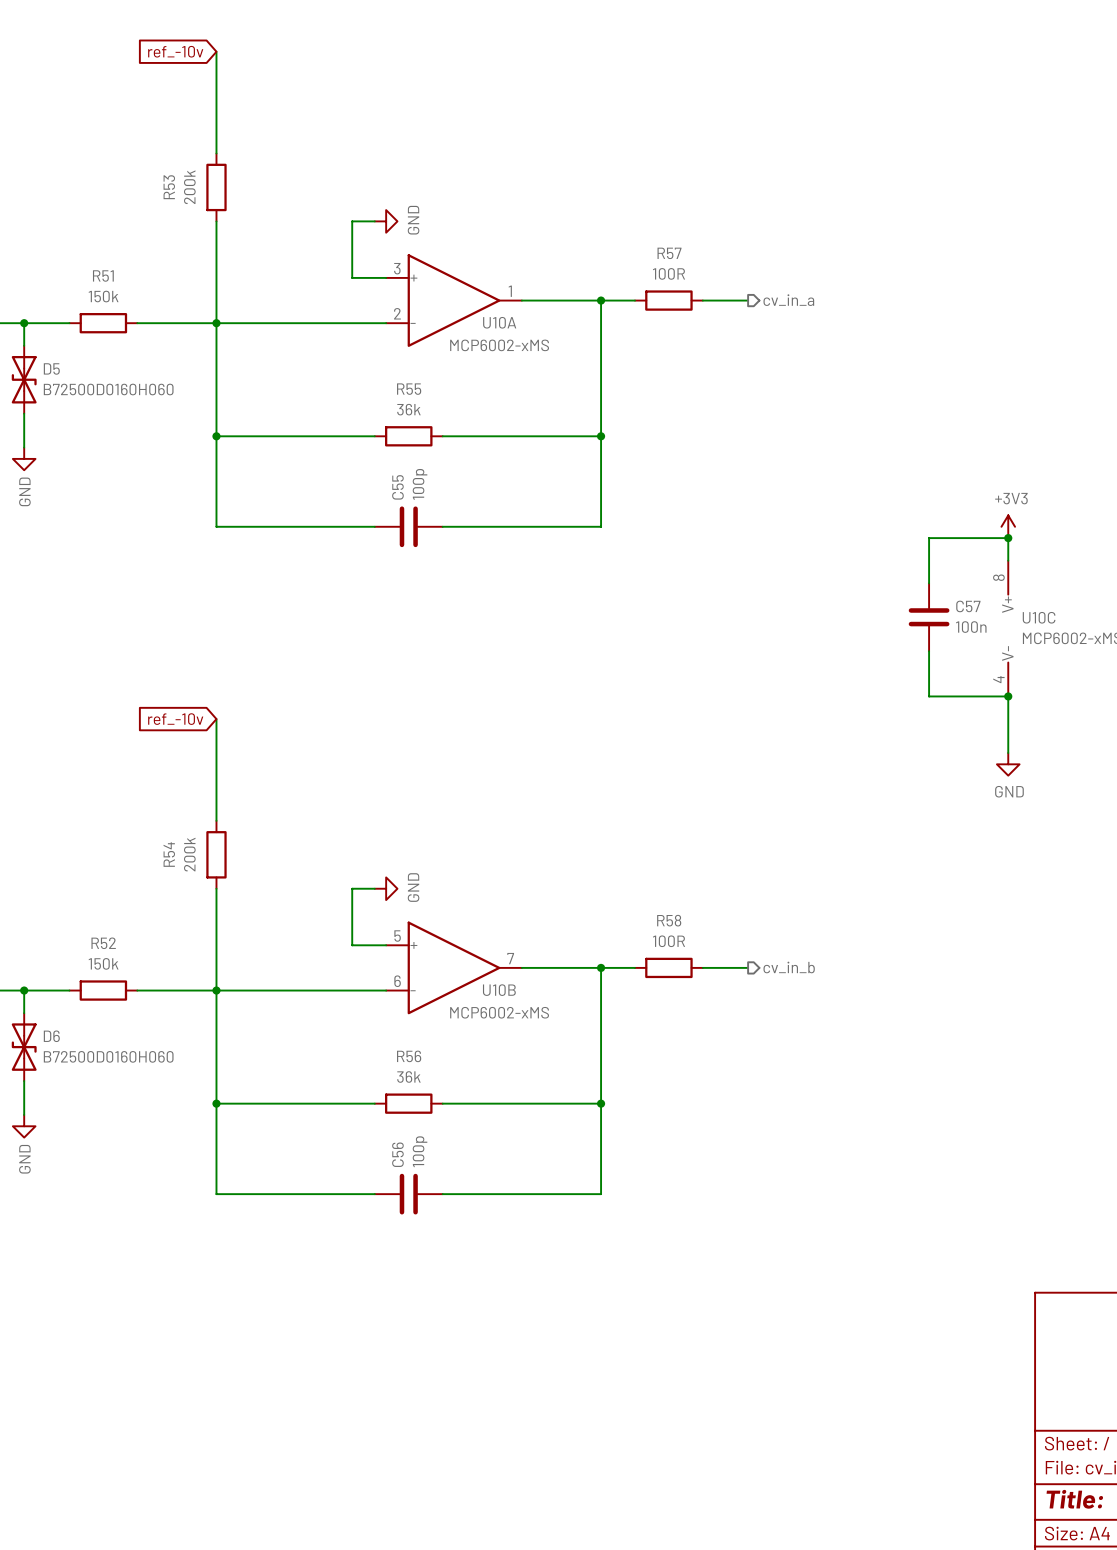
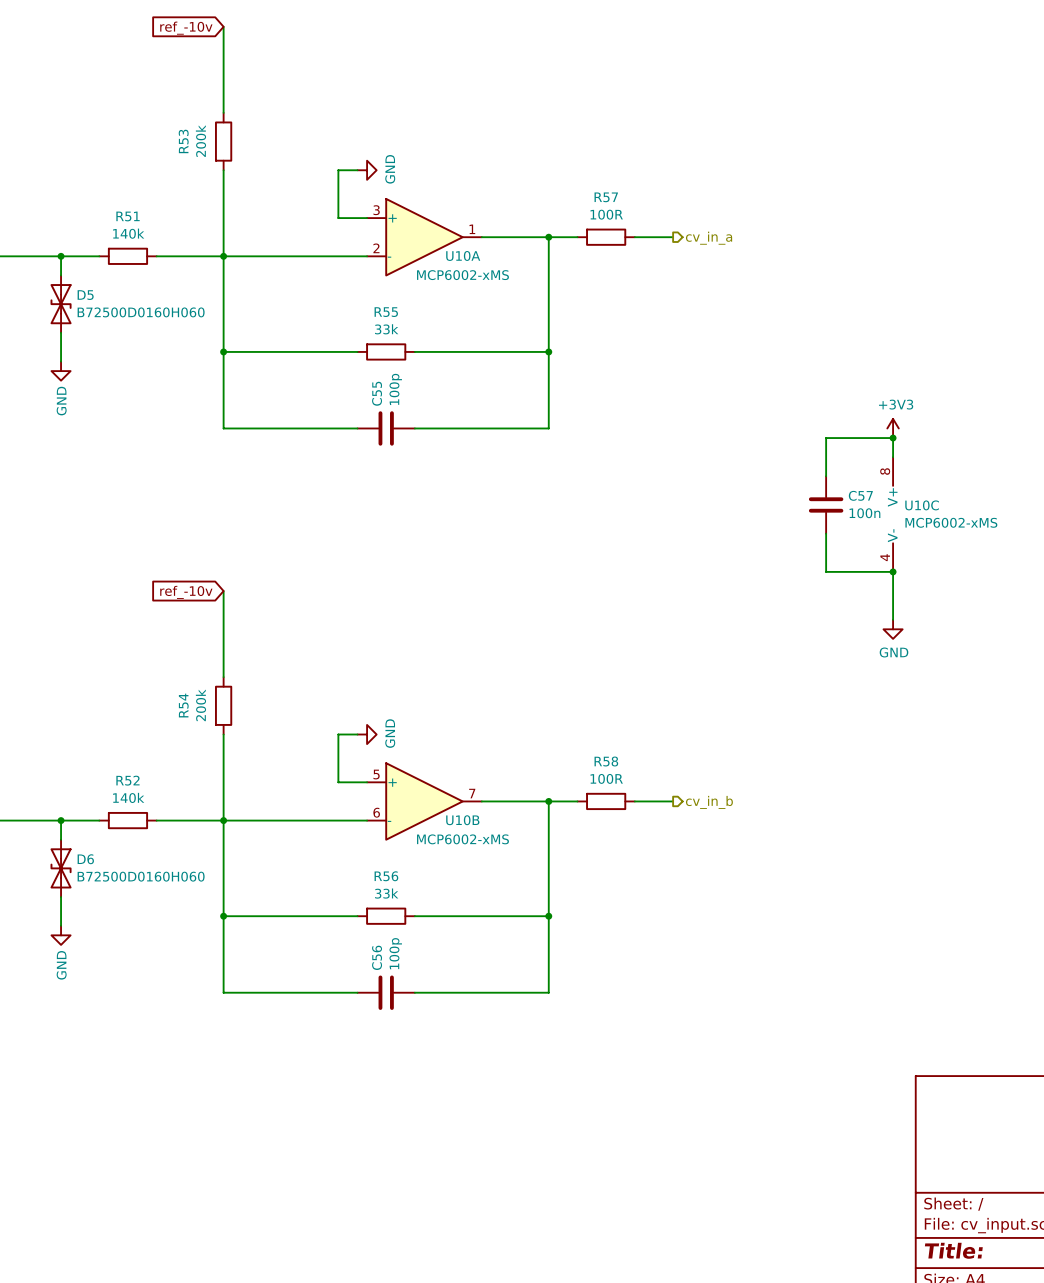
R51 value: 150k (103, 296) -> 140k (128, 233)
R55 value: 36k (408, 409) -> 33k (386, 329)
R52 value: 150k (103, 963) -> 140k (128, 797)
R56 value: 36k (408, 1076) -> 33k (386, 893)

